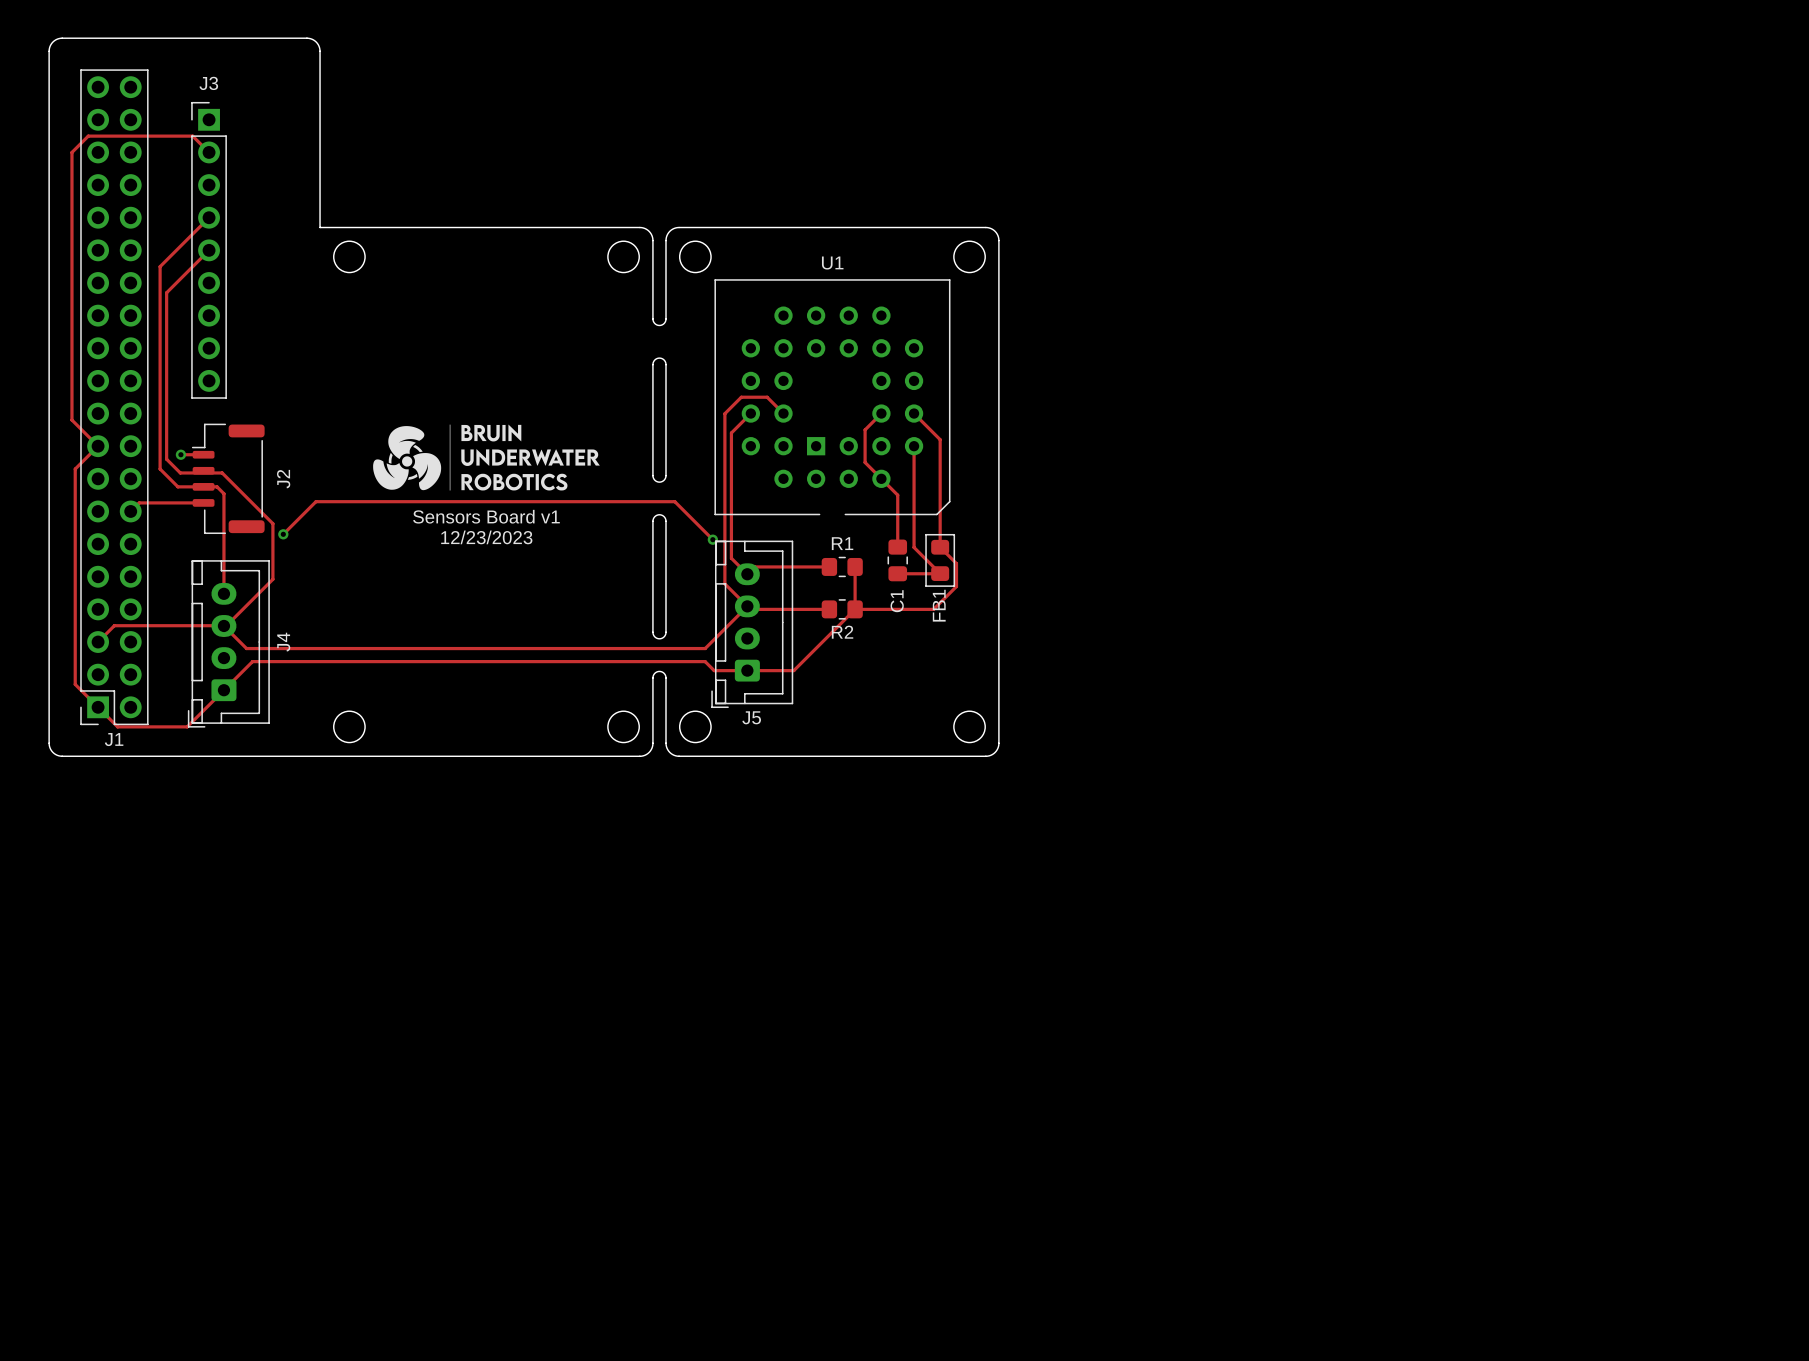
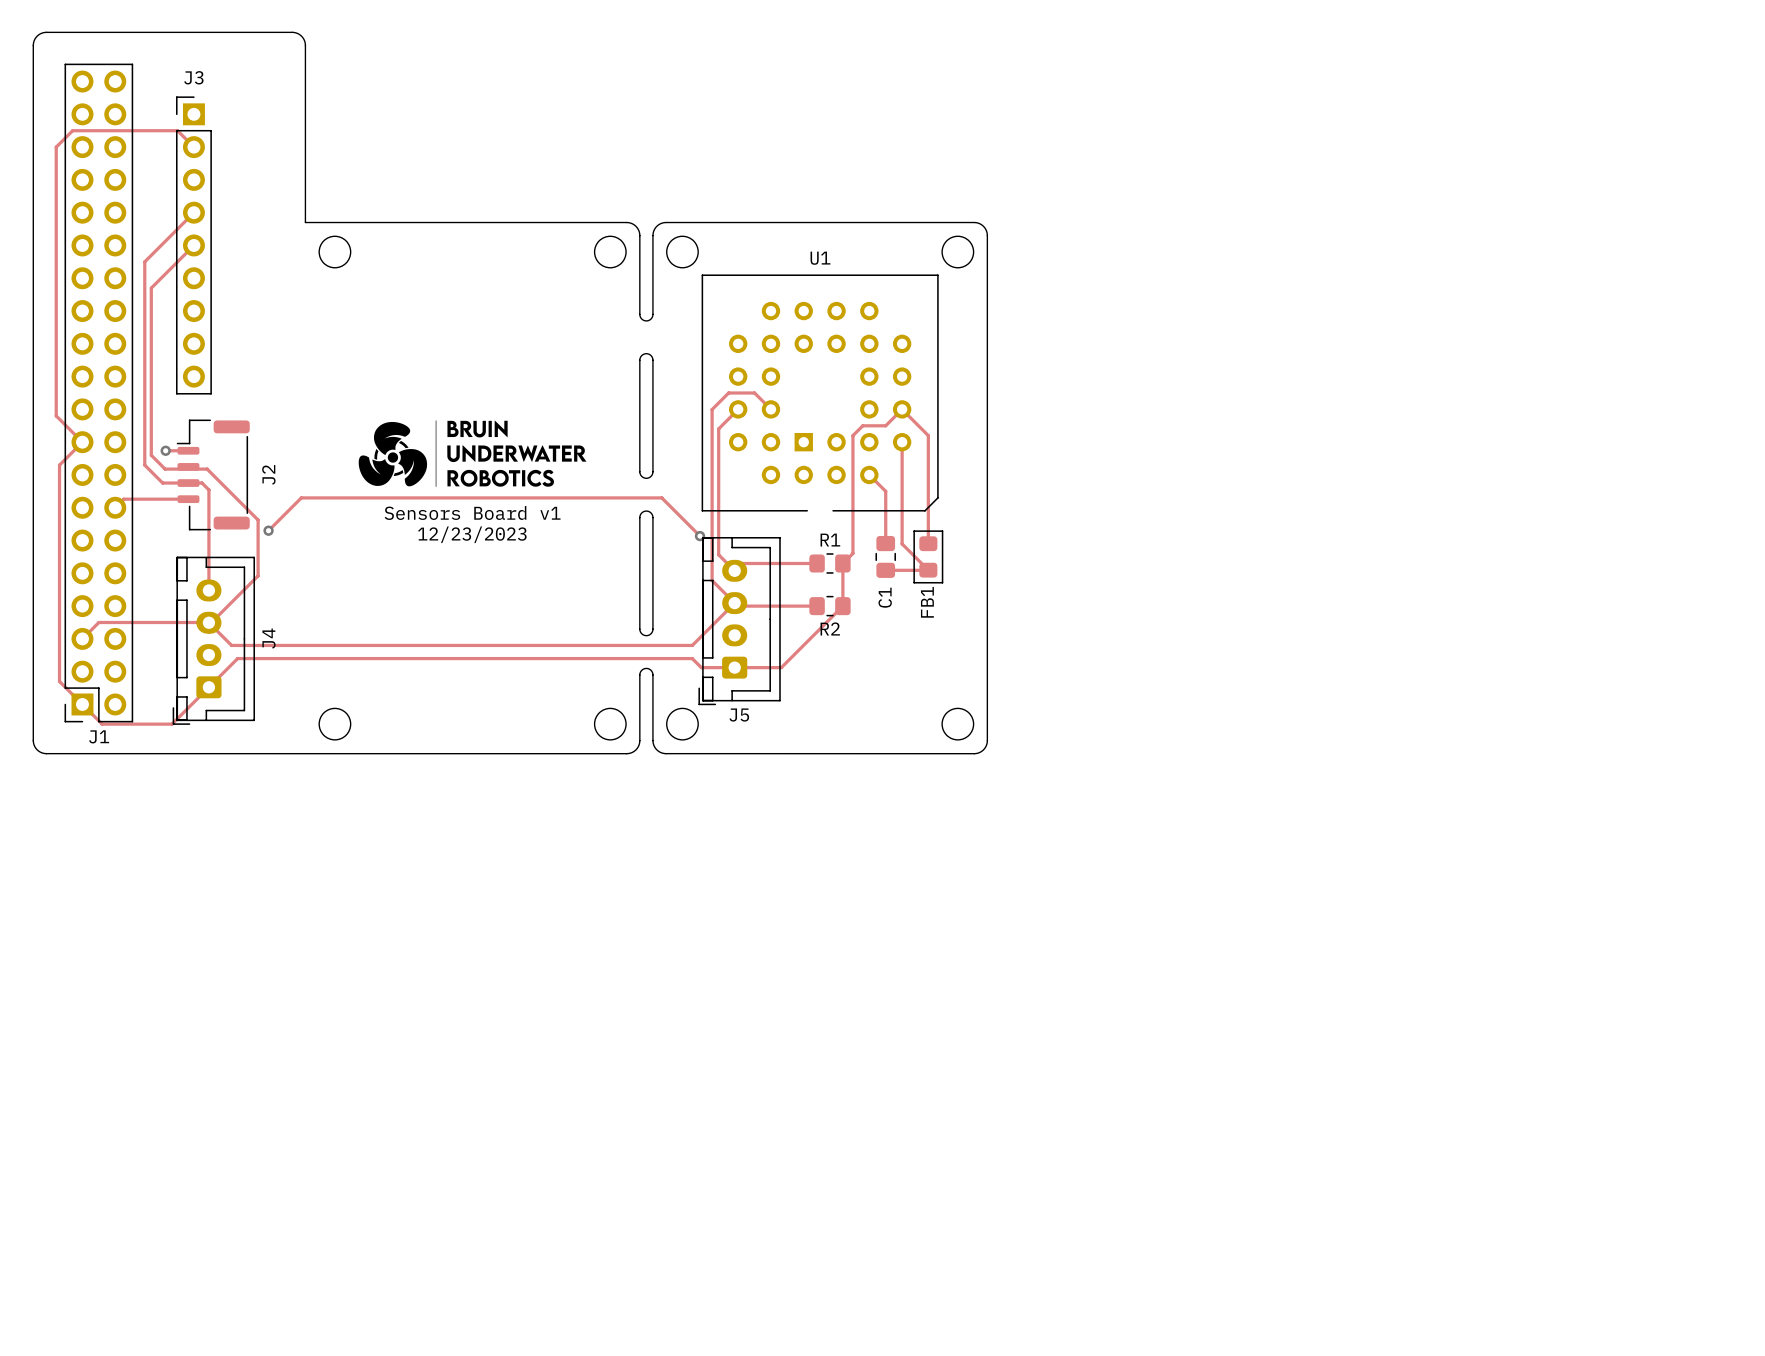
track: (881, 413) (865, 429) (865, 439) -> (902, 409) (885, 425) (862, 425) (852, 435)
track: (865, 462) (881, 478) -> (852, 458) (852, 553) (842, 563)
track: (940, 547) (956, 563) (956, 586) (933, 609) (855, 609) -> none

